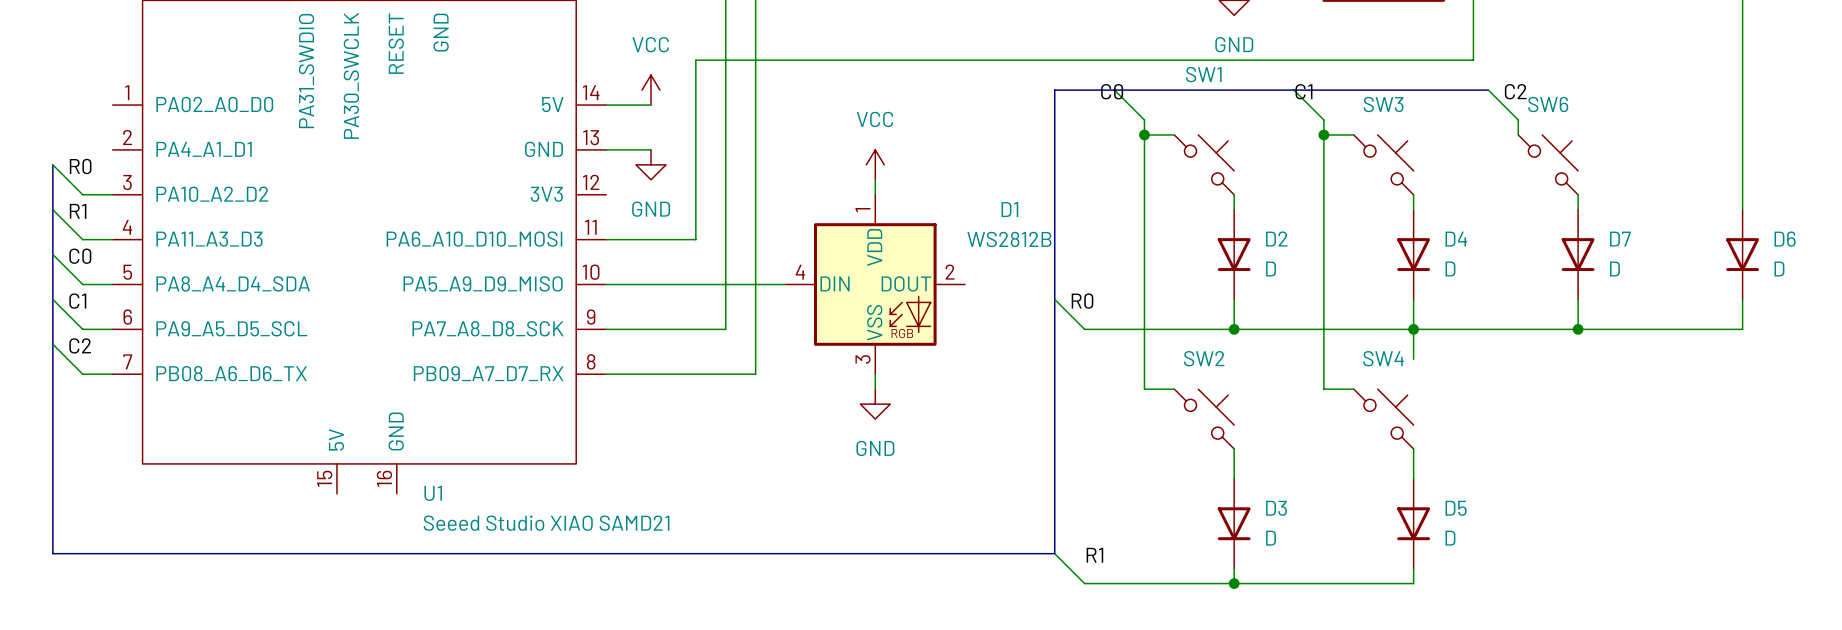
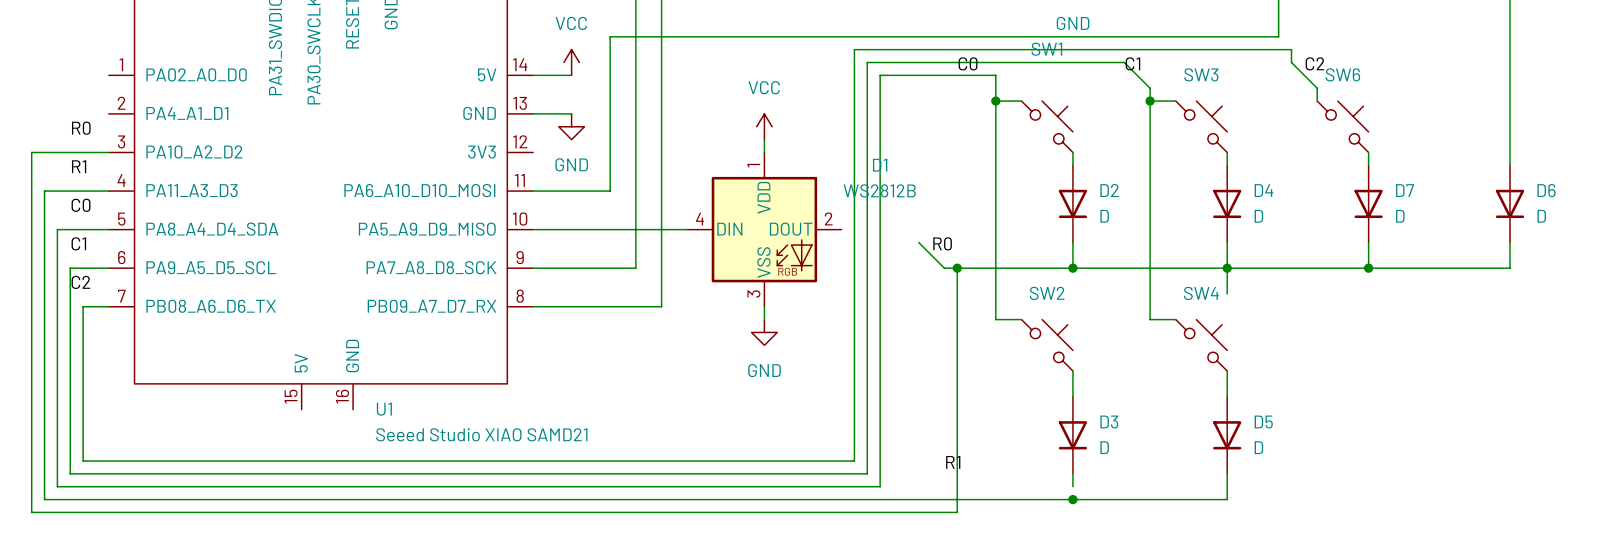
wire: (1114, 90) (1144, 120) -> (83, 229) (57, 229) (57, 486) (880, 486) (880, 75) (995, 75) (995, 88)
bus: (1488, 90) (1054, 90) (1054, 553) (52, 553) (52, 164) -> none
wire: (52, 164) (82, 194) -> (957, 268) (957, 512) (31, 512) (31, 152) (83, 152)
wire: (52, 209) (82, 239) -> none
wire: (52, 254) (82, 284) -> none
wire: (52, 299) (82, 329) -> (1124, 62) (867, 62) (867, 473) (70, 473) (70, 268) (83, 268)
junction: none -> (957, 268)
wire: (52, 344) (82, 374) -> (1291, 62) (1291, 49) (854, 49) (854, 461) (83, 461) (83, 306)
wire: (1054, 553) (1084, 583) (1413, 583) -> (83, 191) (44, 191) (44, 499) (1227, 499) (1227, 486)
junction position: (1234, 583) -> (1072, 499)

